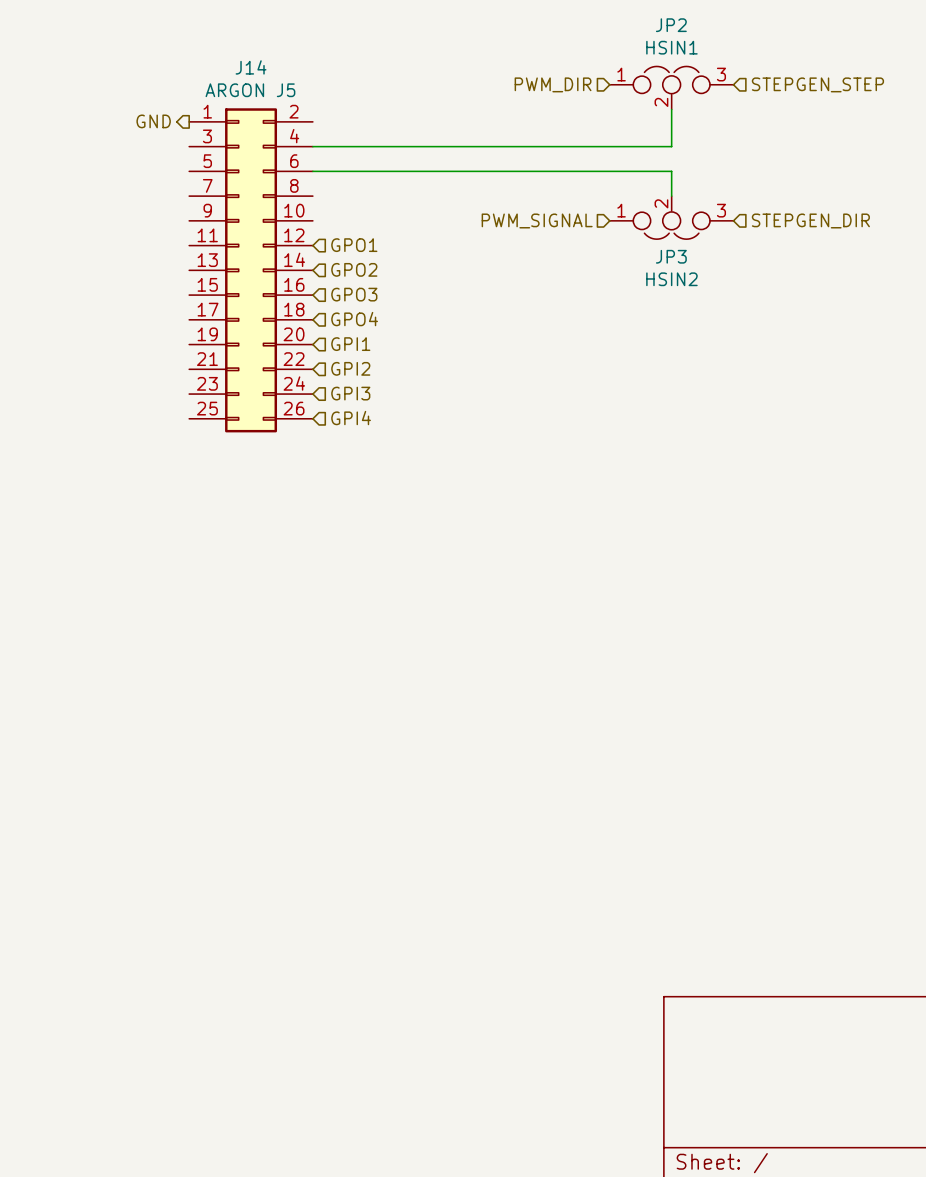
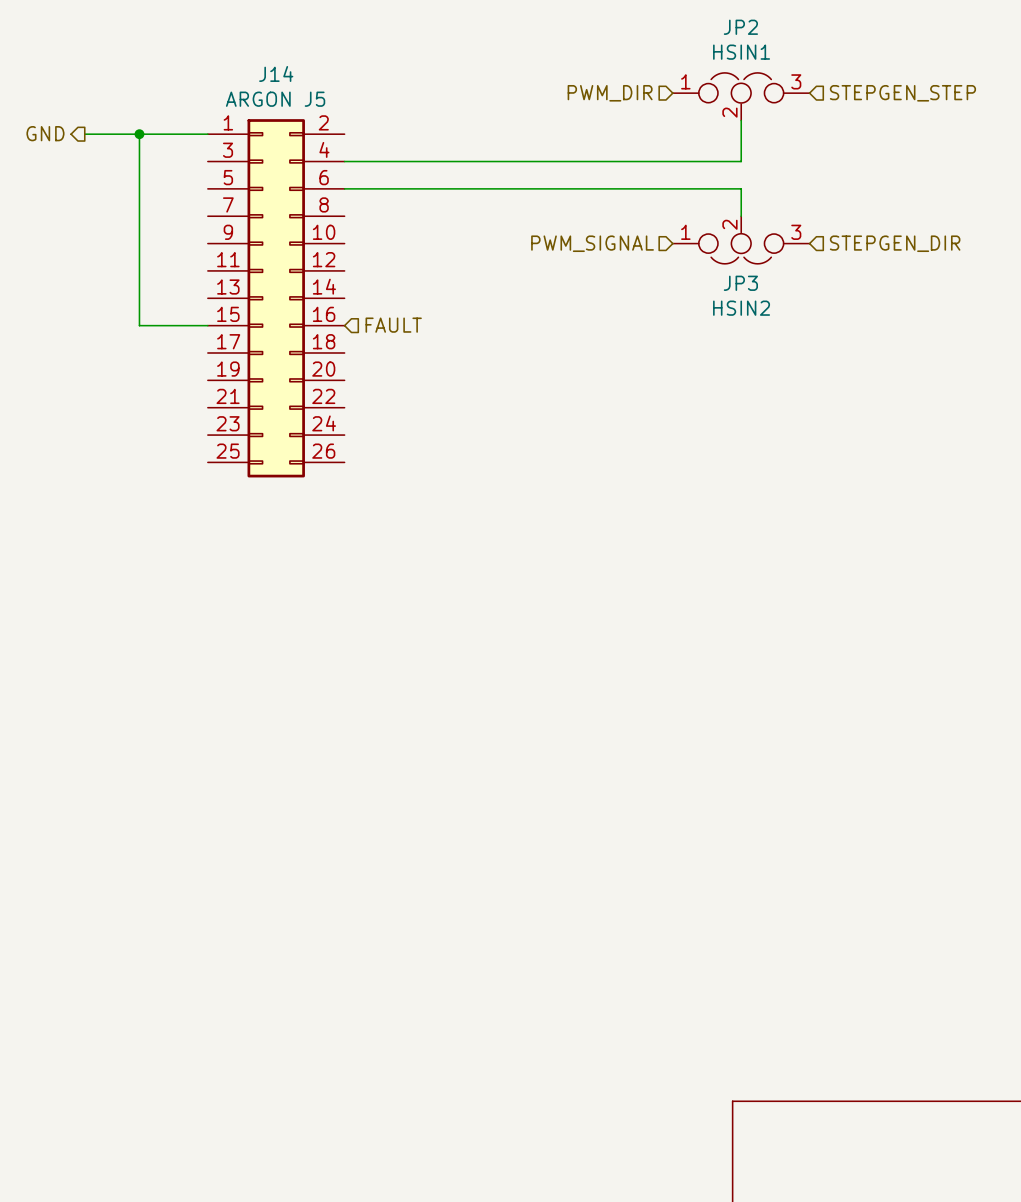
wire: none -> (84, 134) (207, 134)
wire: none -> (139, 134) (139, 325) (207, 325)
junction: none -> (139, 134)
hierarchical label position: GND (153, 121) -> GND (45, 133)
hierarchical label: GPO1 (354, 245) -> none
hierarchical label: GPO2 (354, 269) -> none
hierarchical label: GPO3 (354, 294) -> FAULT (393, 325)
hierarchical label: GPO4 (354, 319) -> none
hierarchical label: GPI1 (350, 344) -> none
hierarchical label: GPI2 (350, 368) -> none
hierarchical label: GPI3 (350, 393) -> none
hierarchical label: GPI4 (351, 418) -> none

